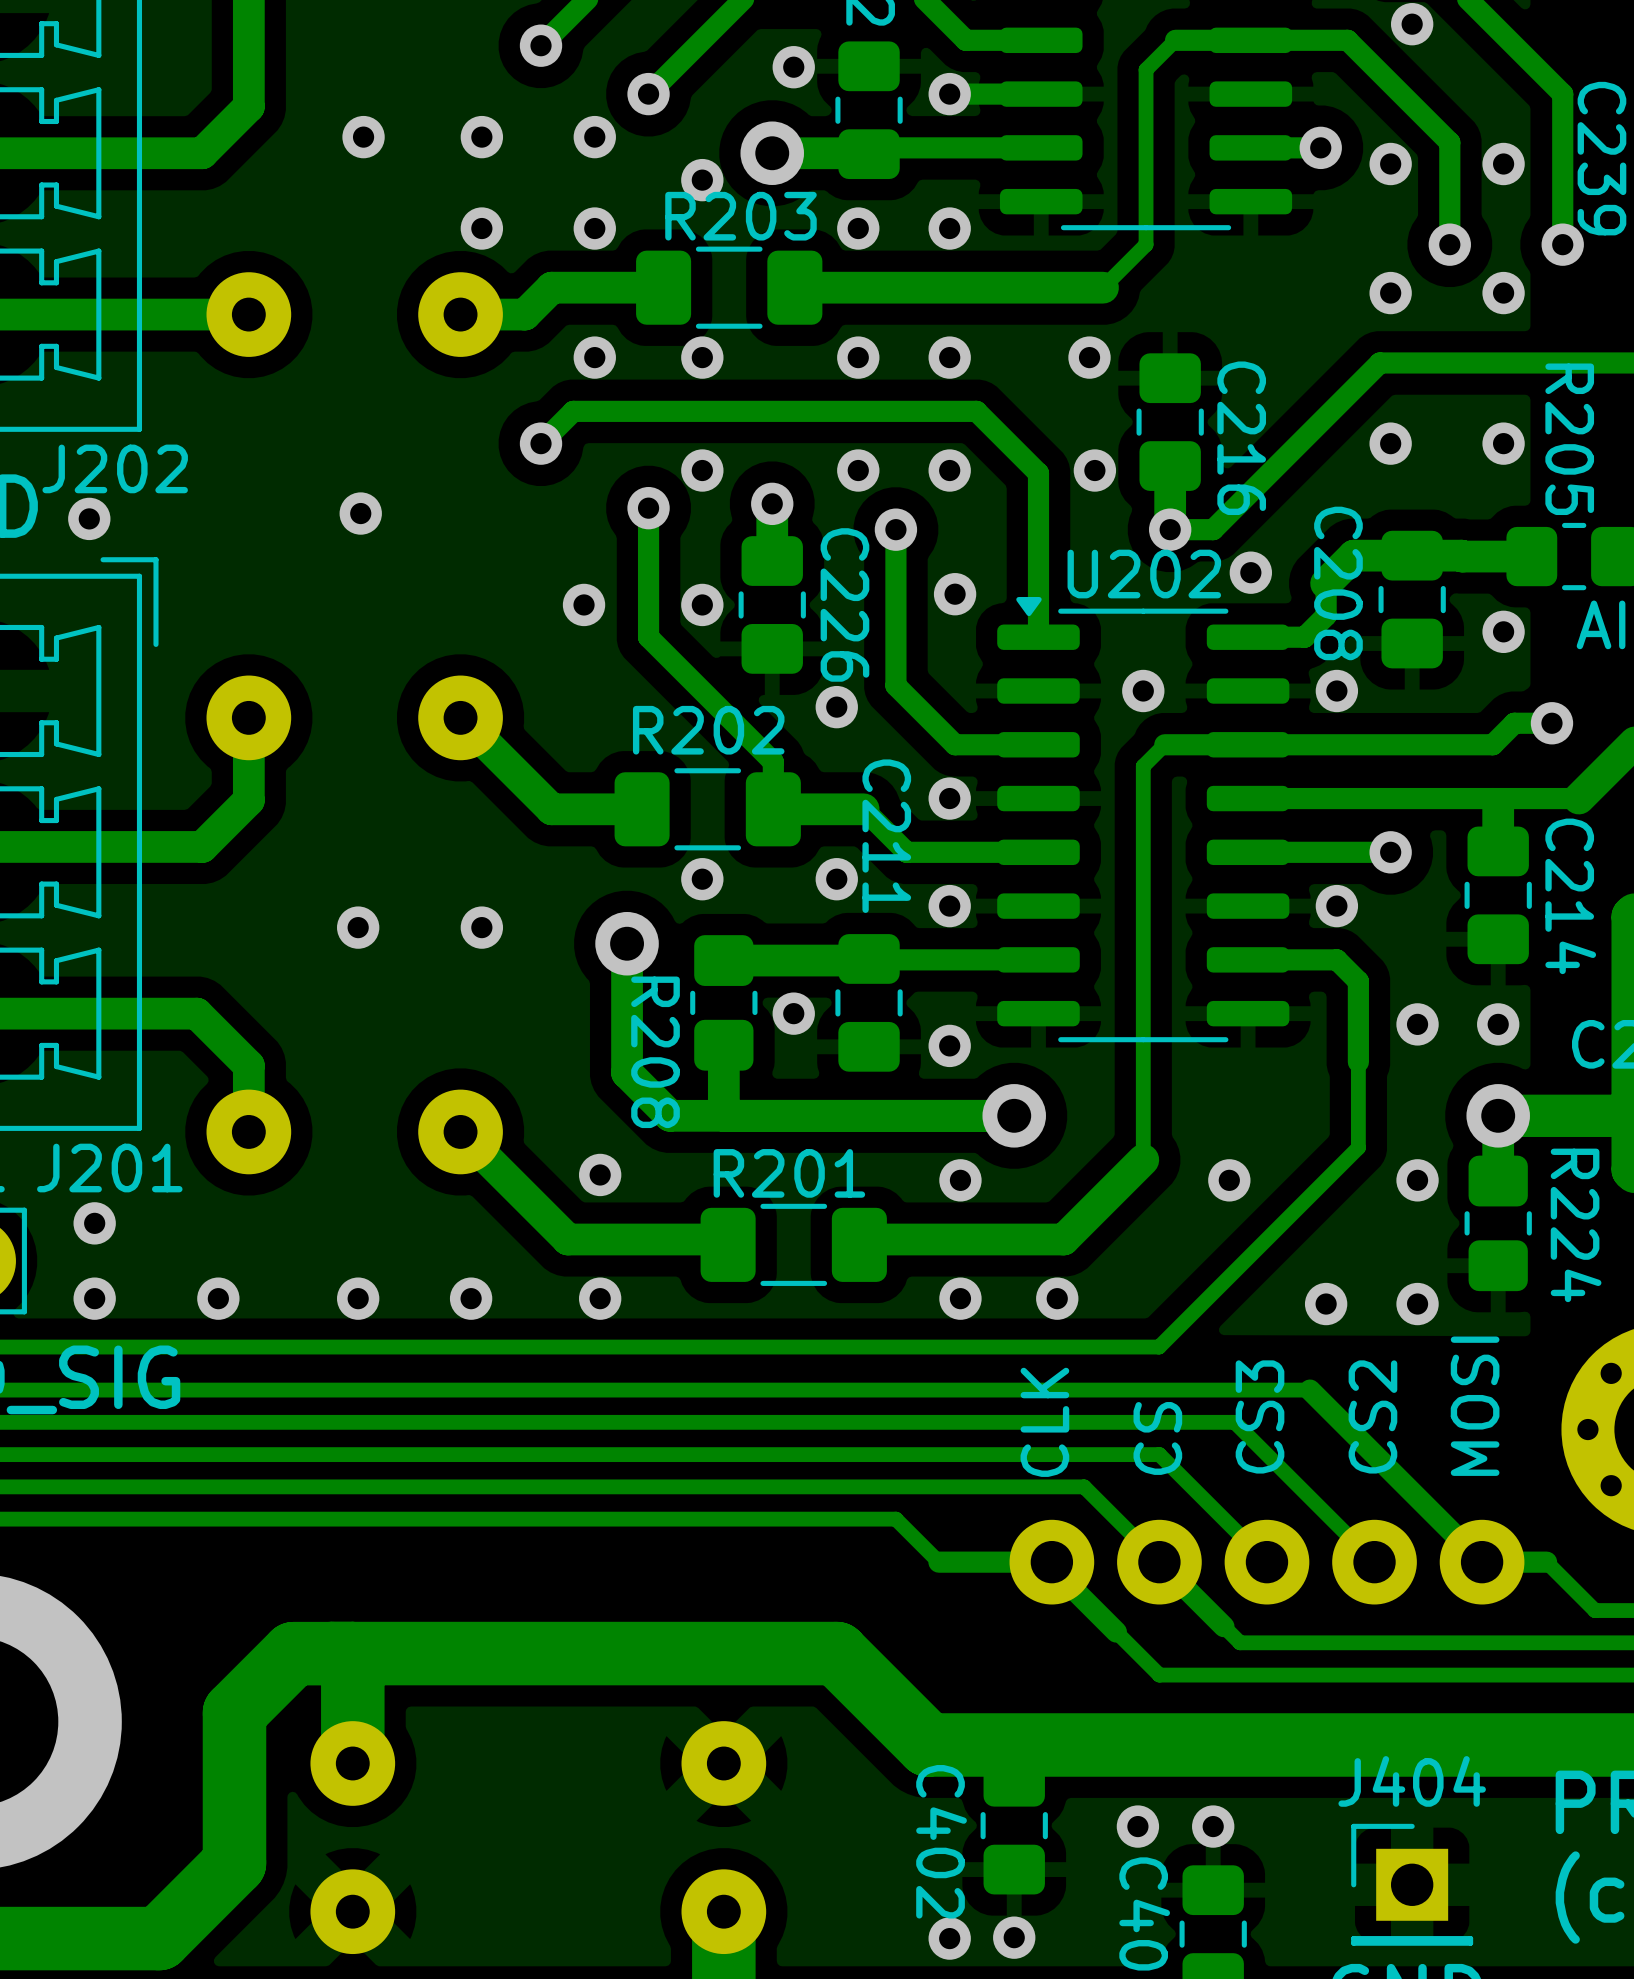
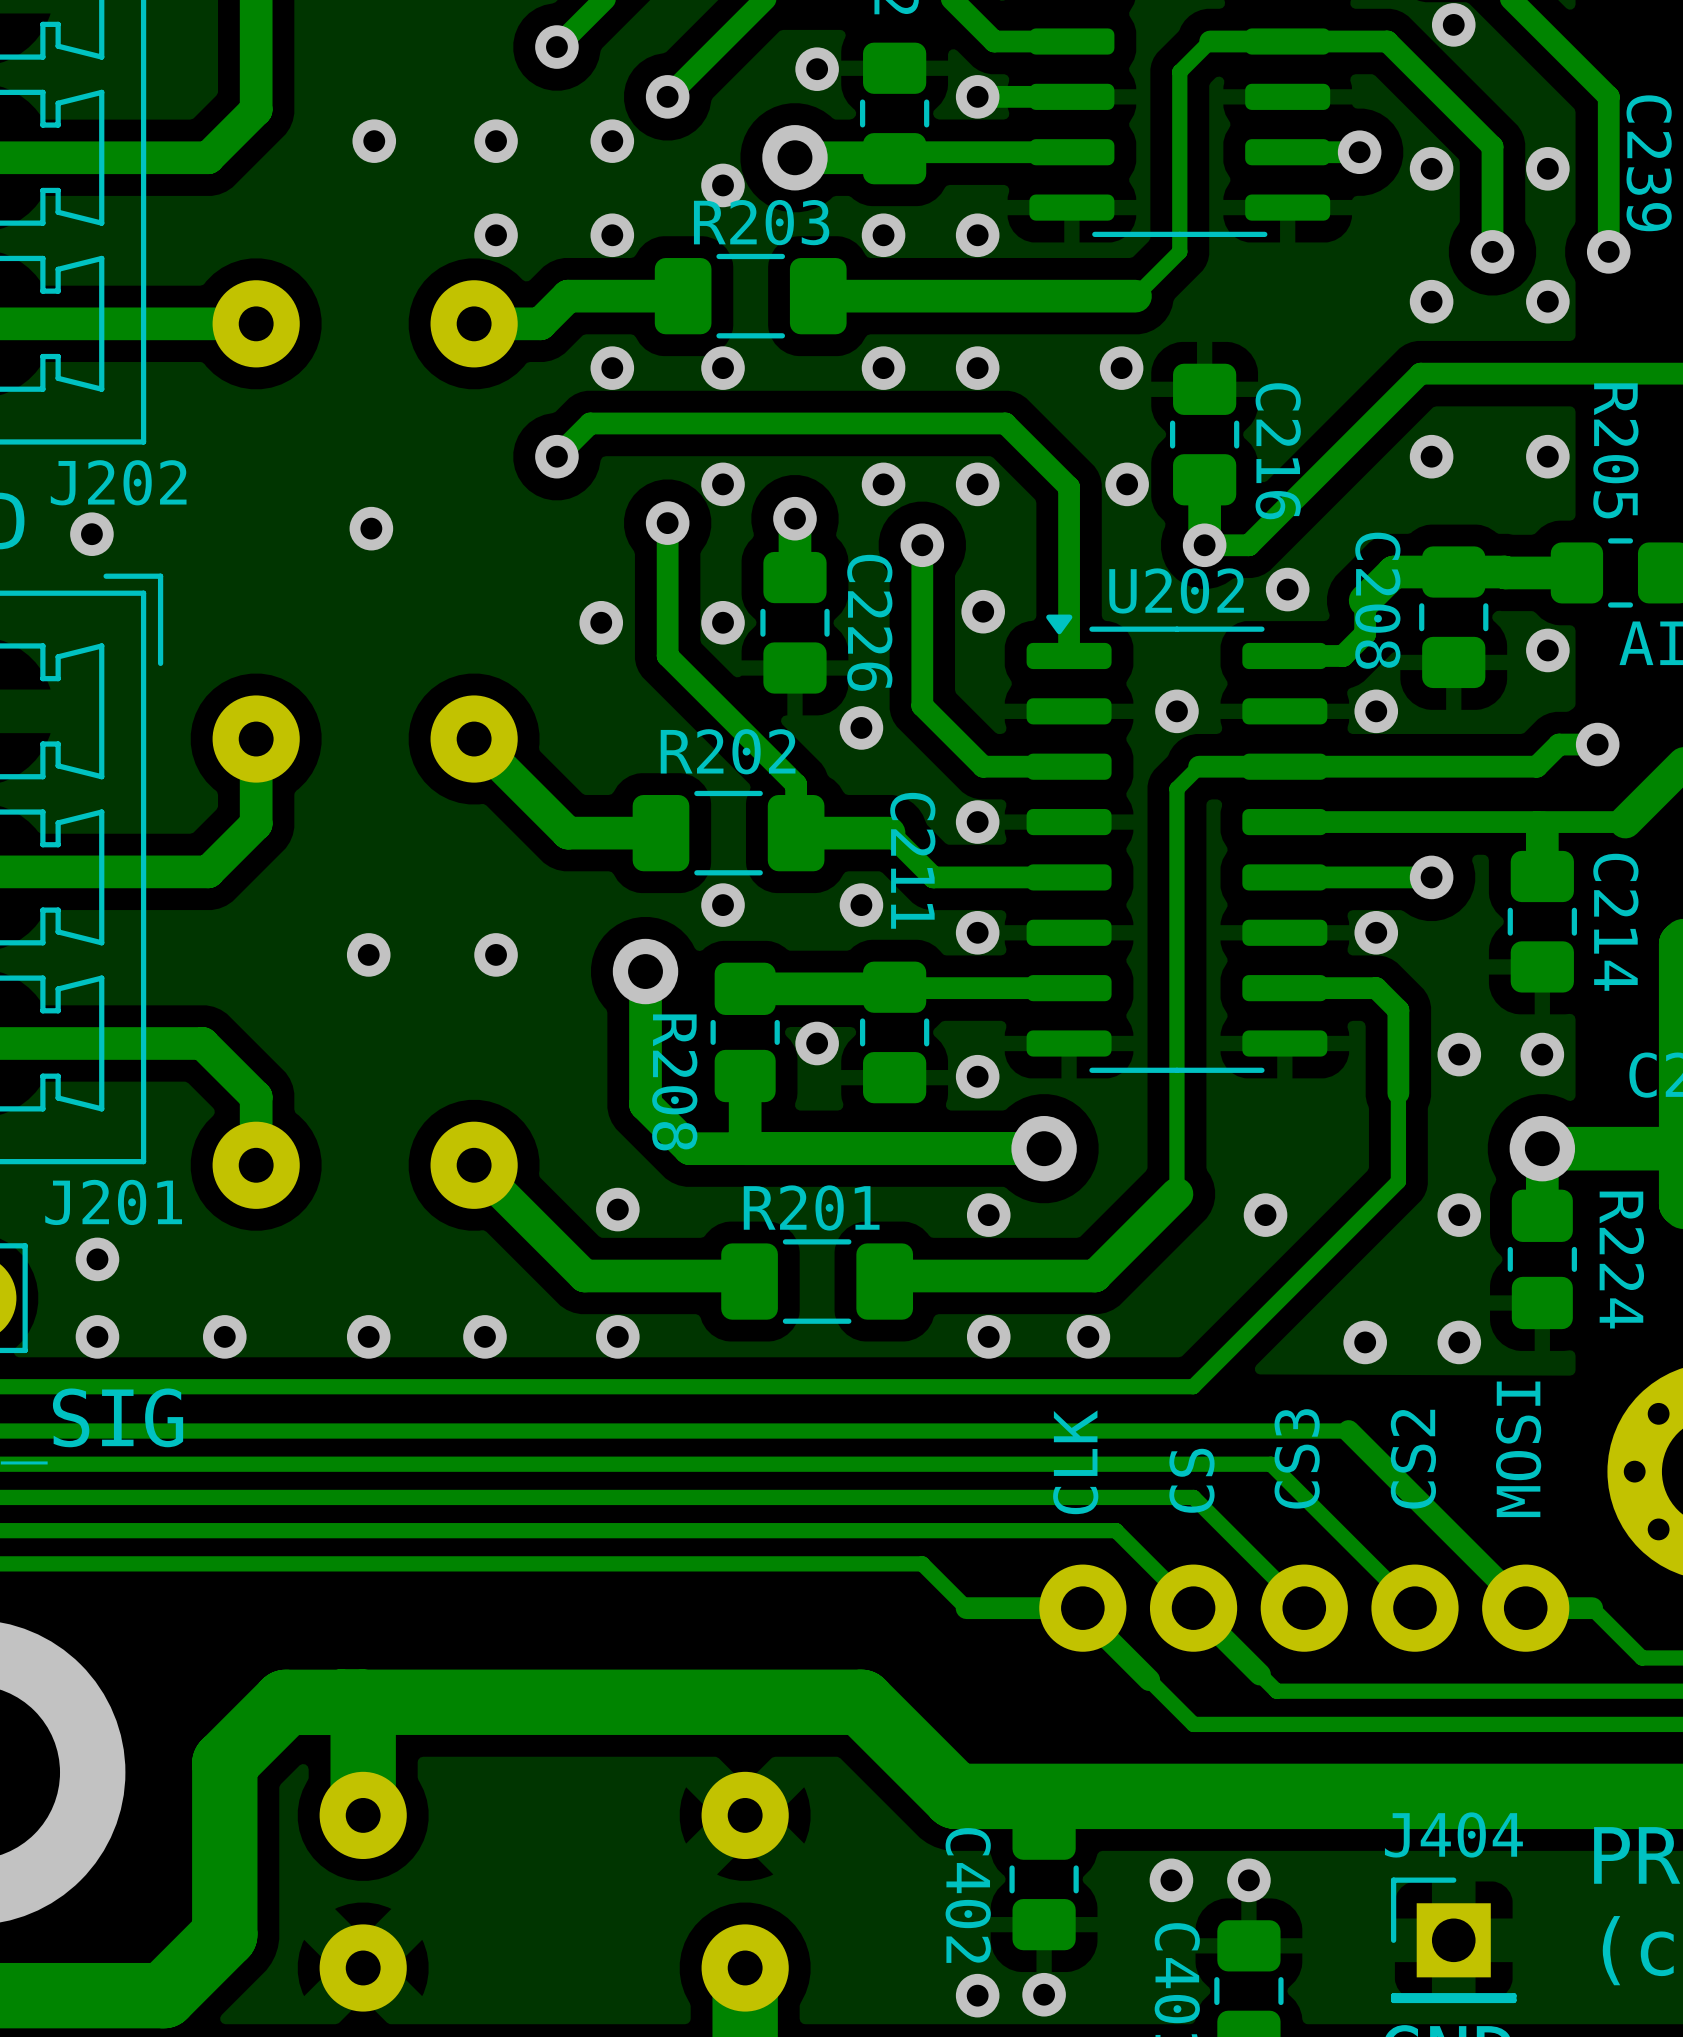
track: (293, 1653) (234, 1712) (234, 1863) (218, 1879) -> (302, 1702) (285, 1702) (224, 1763) (224, 1934)

